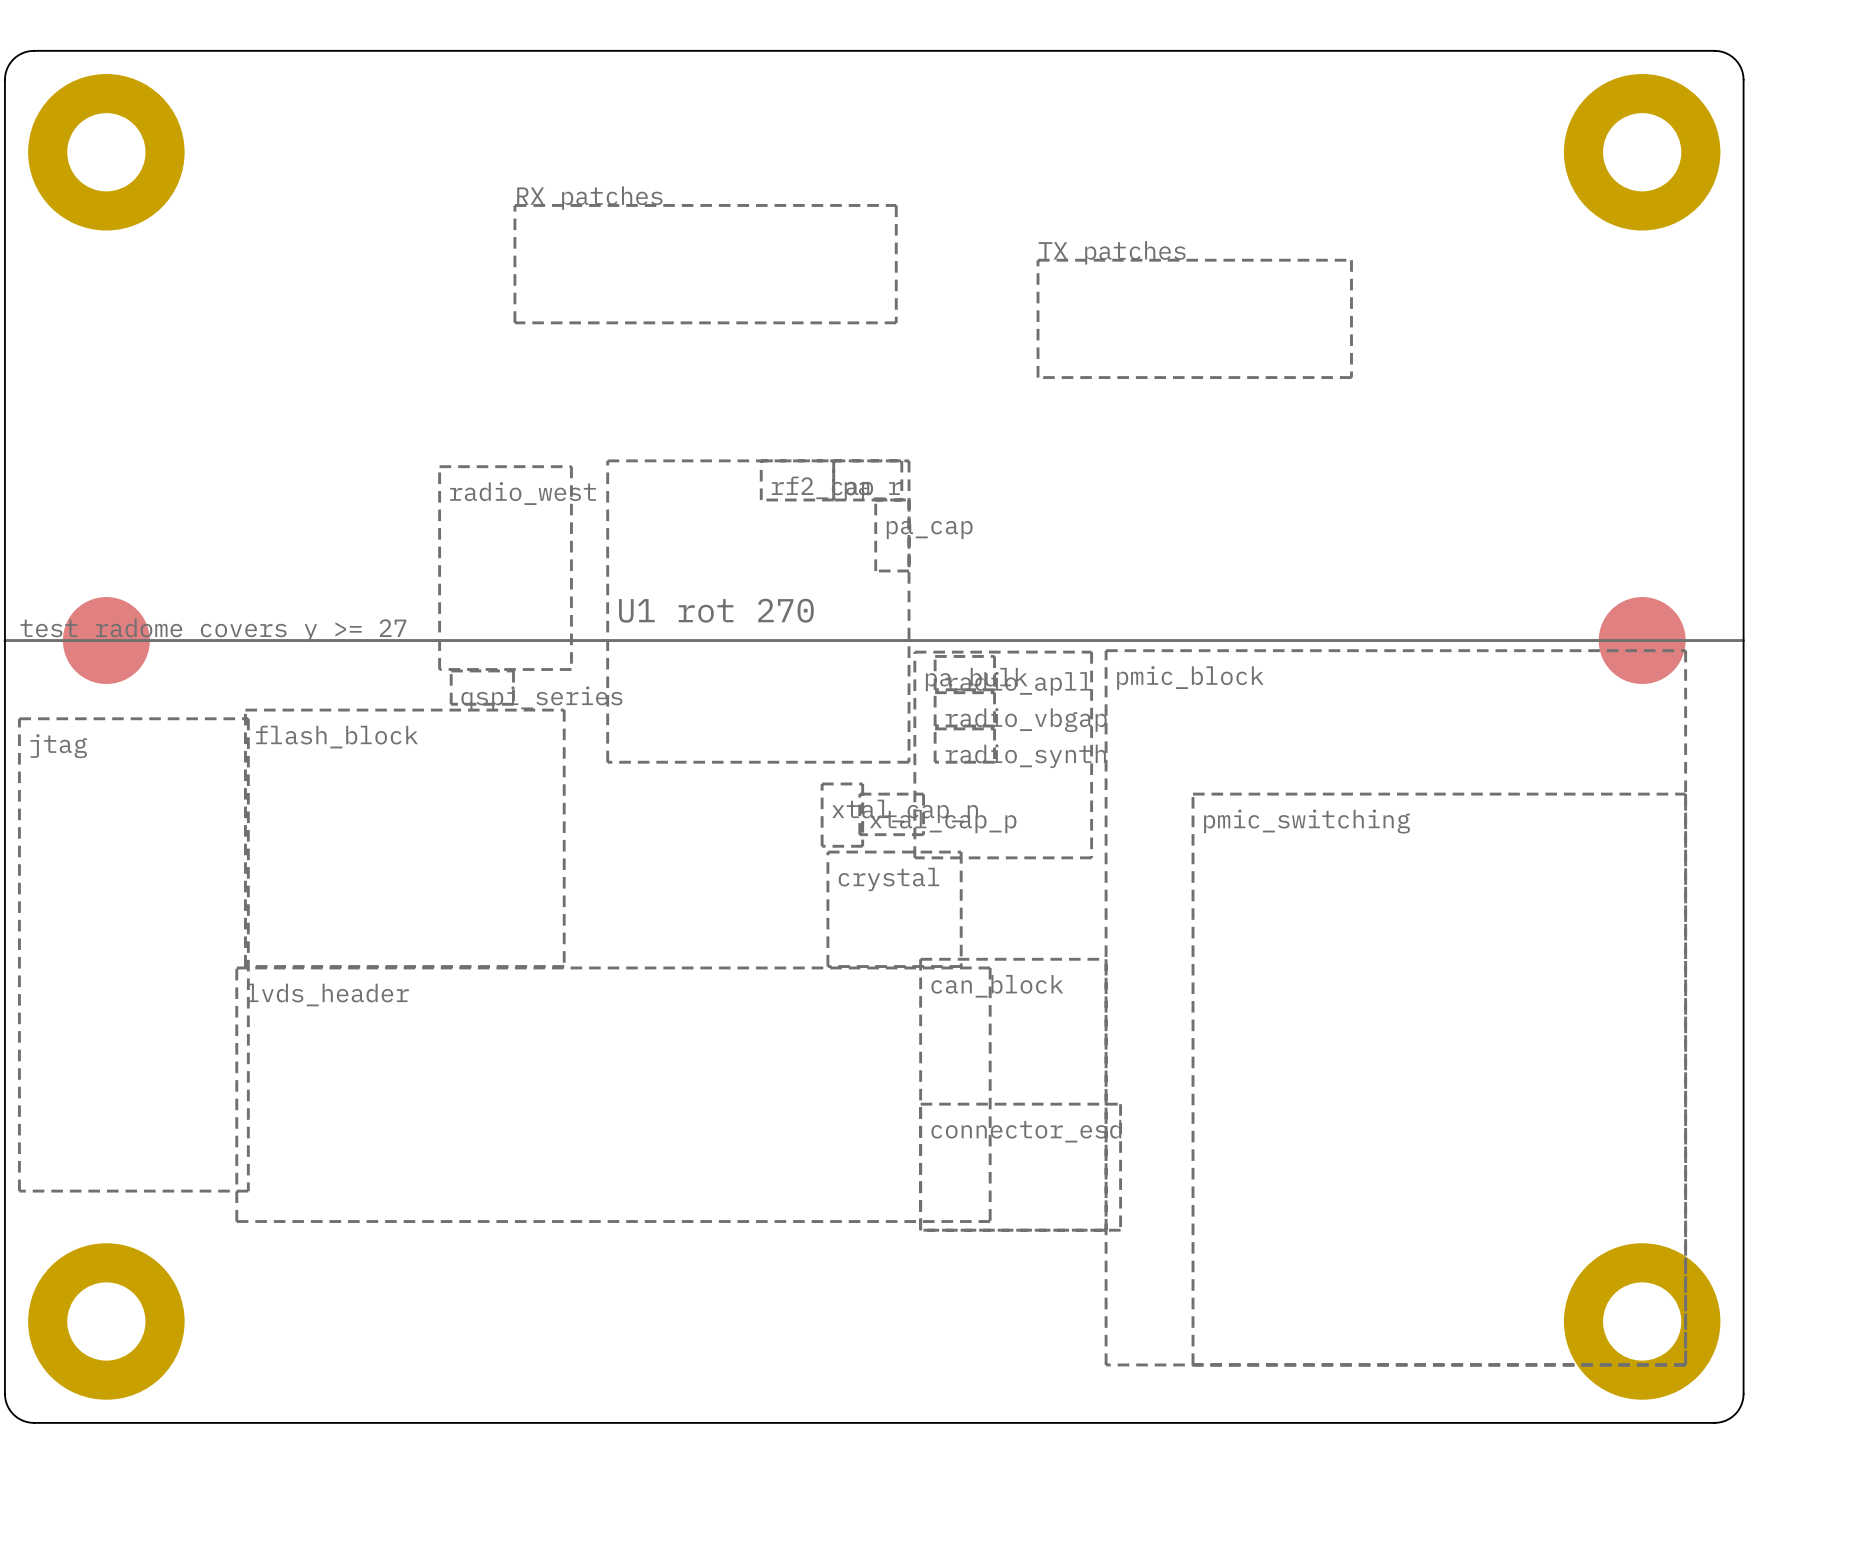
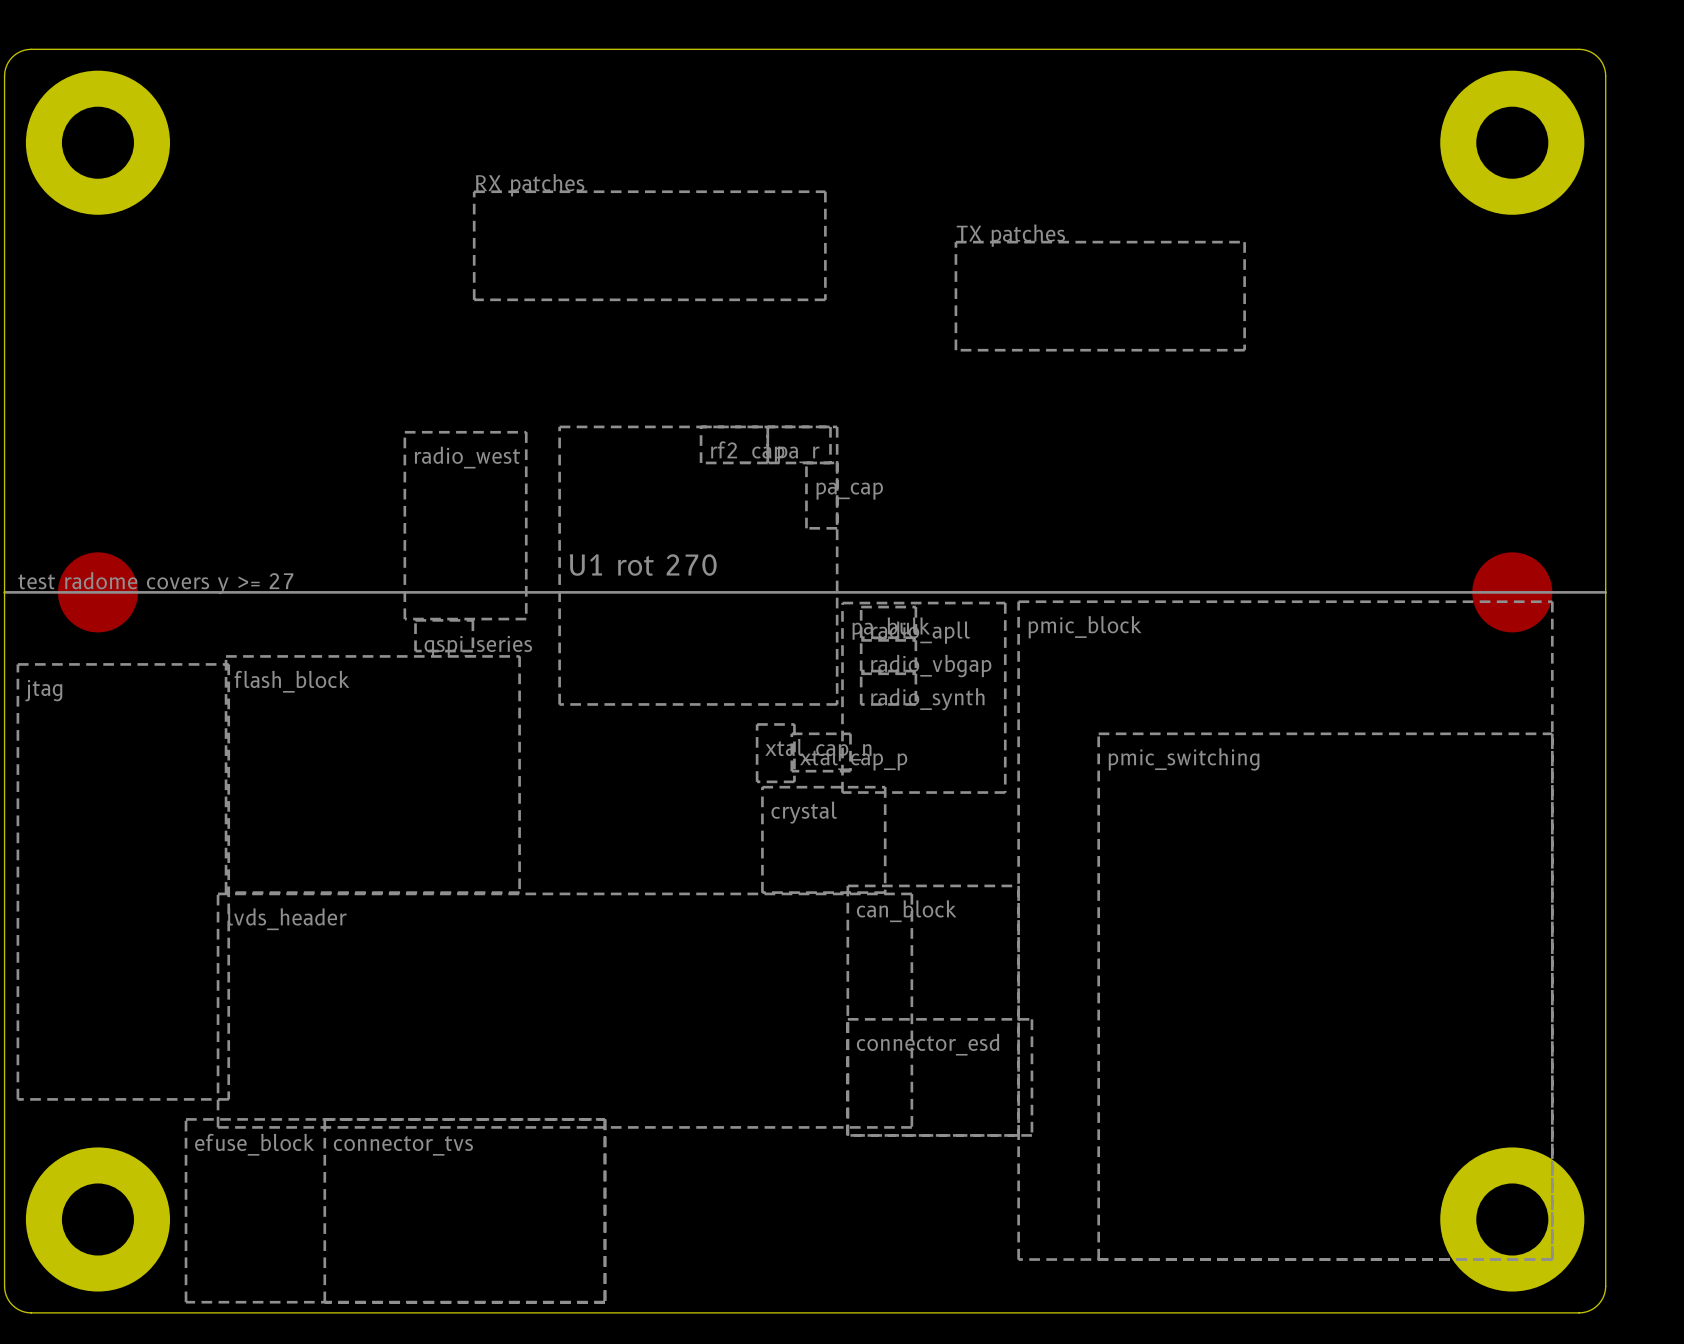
line: none -> (186, 1119) (604, 1119) (604, 1302) (186, 1302) (186, 1119)
line: none -> (324, 1119) (324, 1302)
text: none -> efuse_block (254, 1144)
text: none -> connector_tvs (403, 1145)

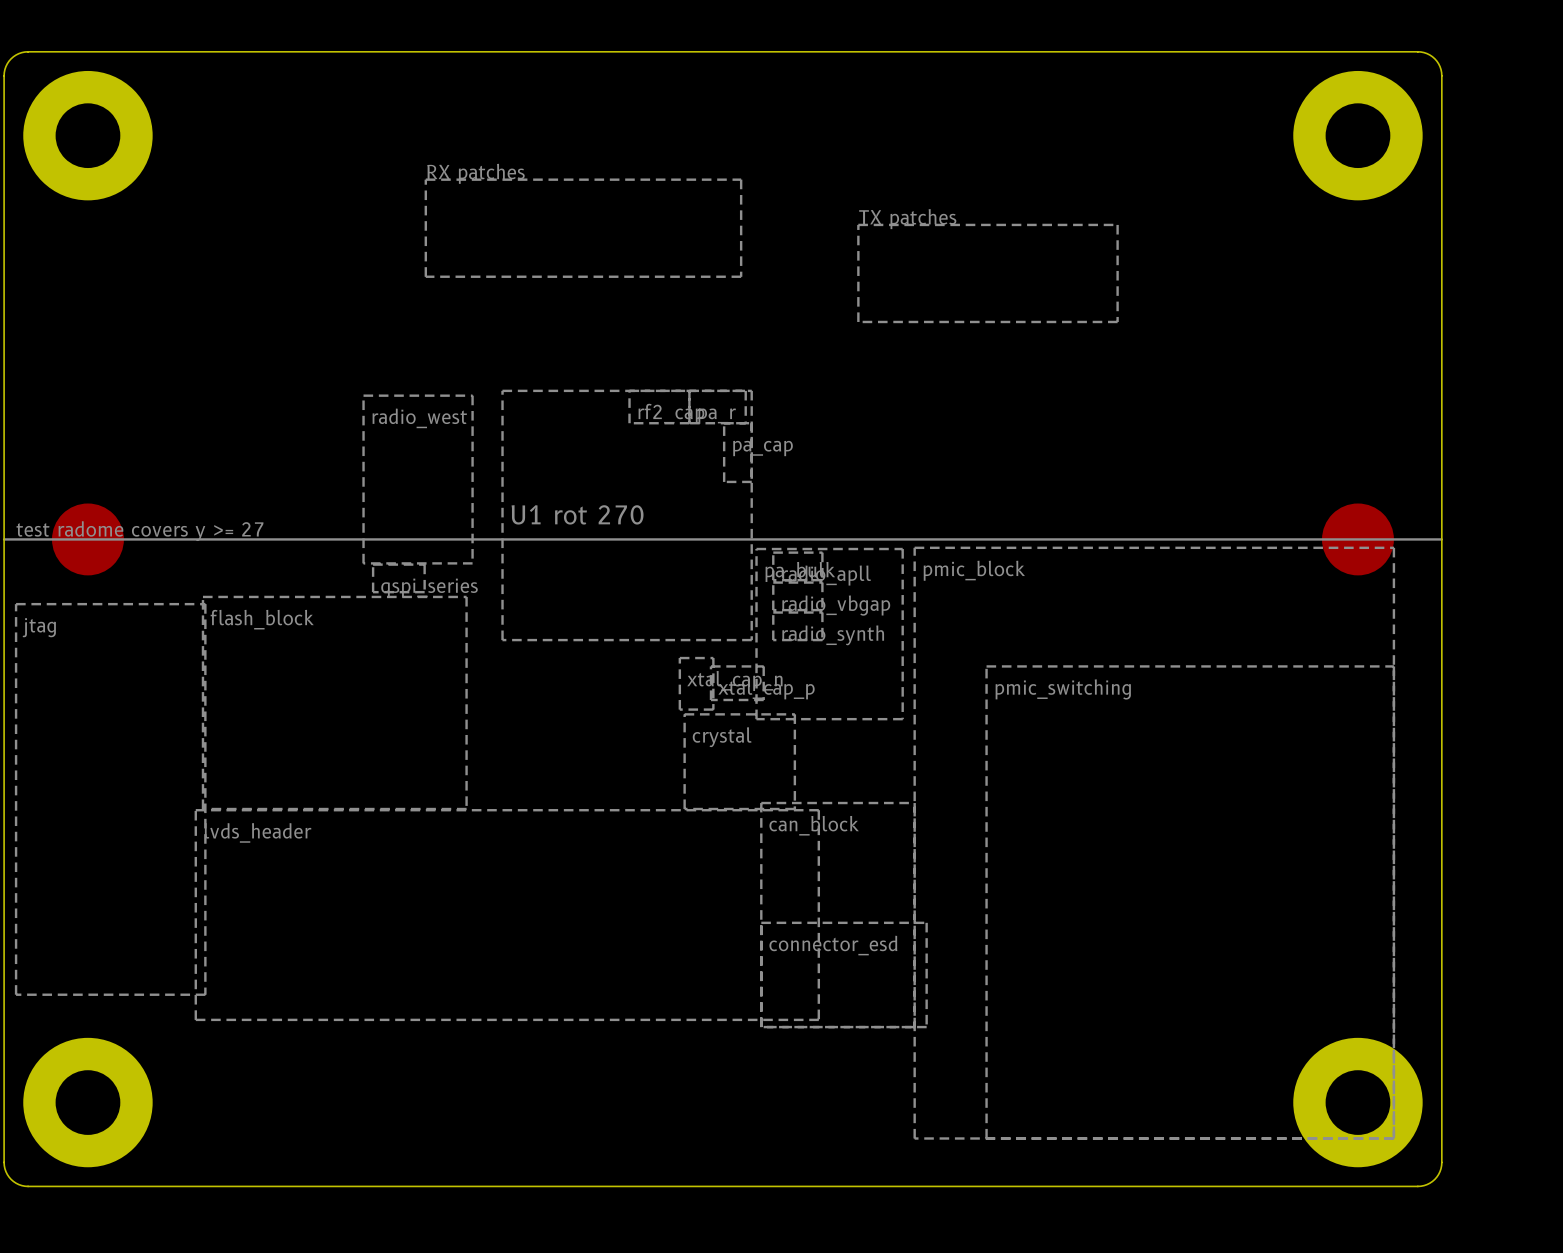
line: (186, 1119) (604, 1119) (604, 1302) (186, 1302) (186, 1119) -> none
line: (324, 1119) (324, 1302) -> none
text: efuse_block (254, 1144) -> none
text: connector_tvs (403, 1145) -> none

